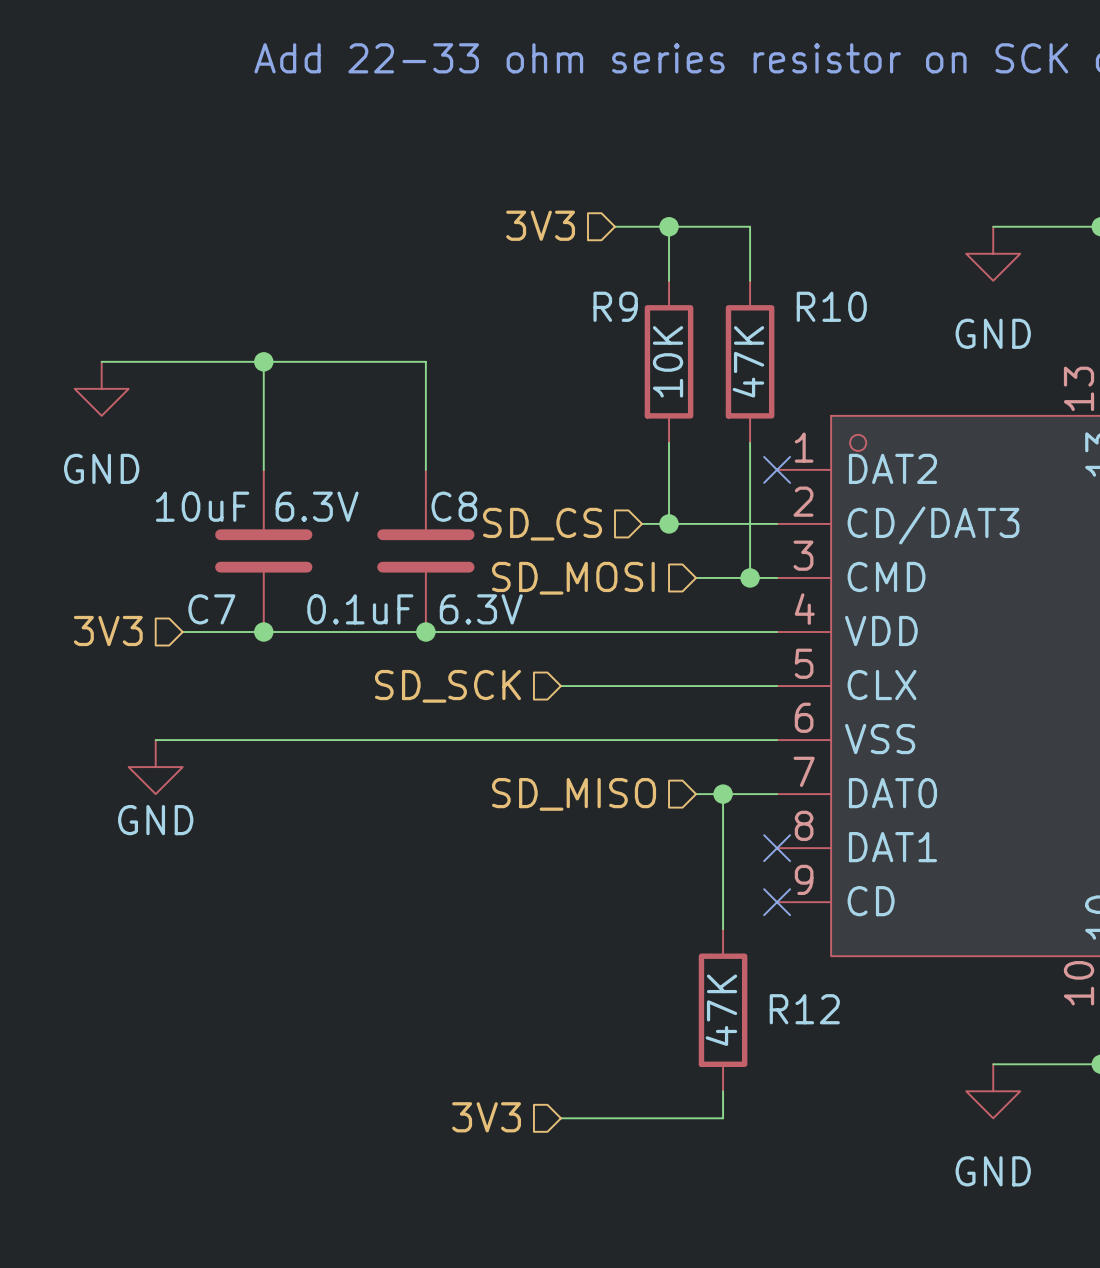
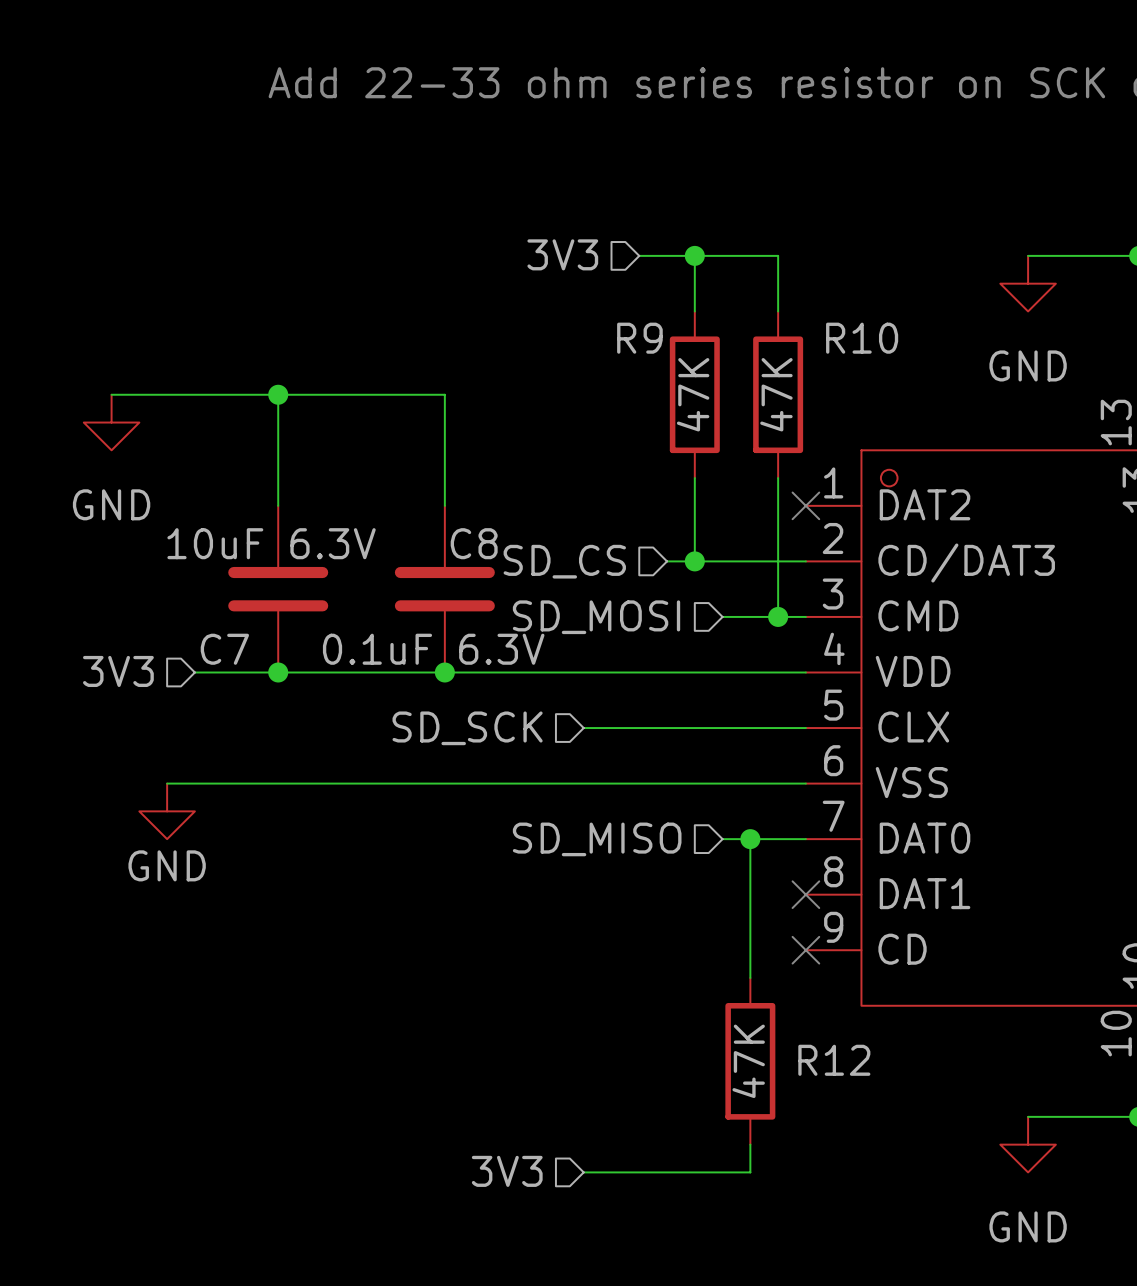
R9 value: 10K (668, 361) -> 47K (693, 394)

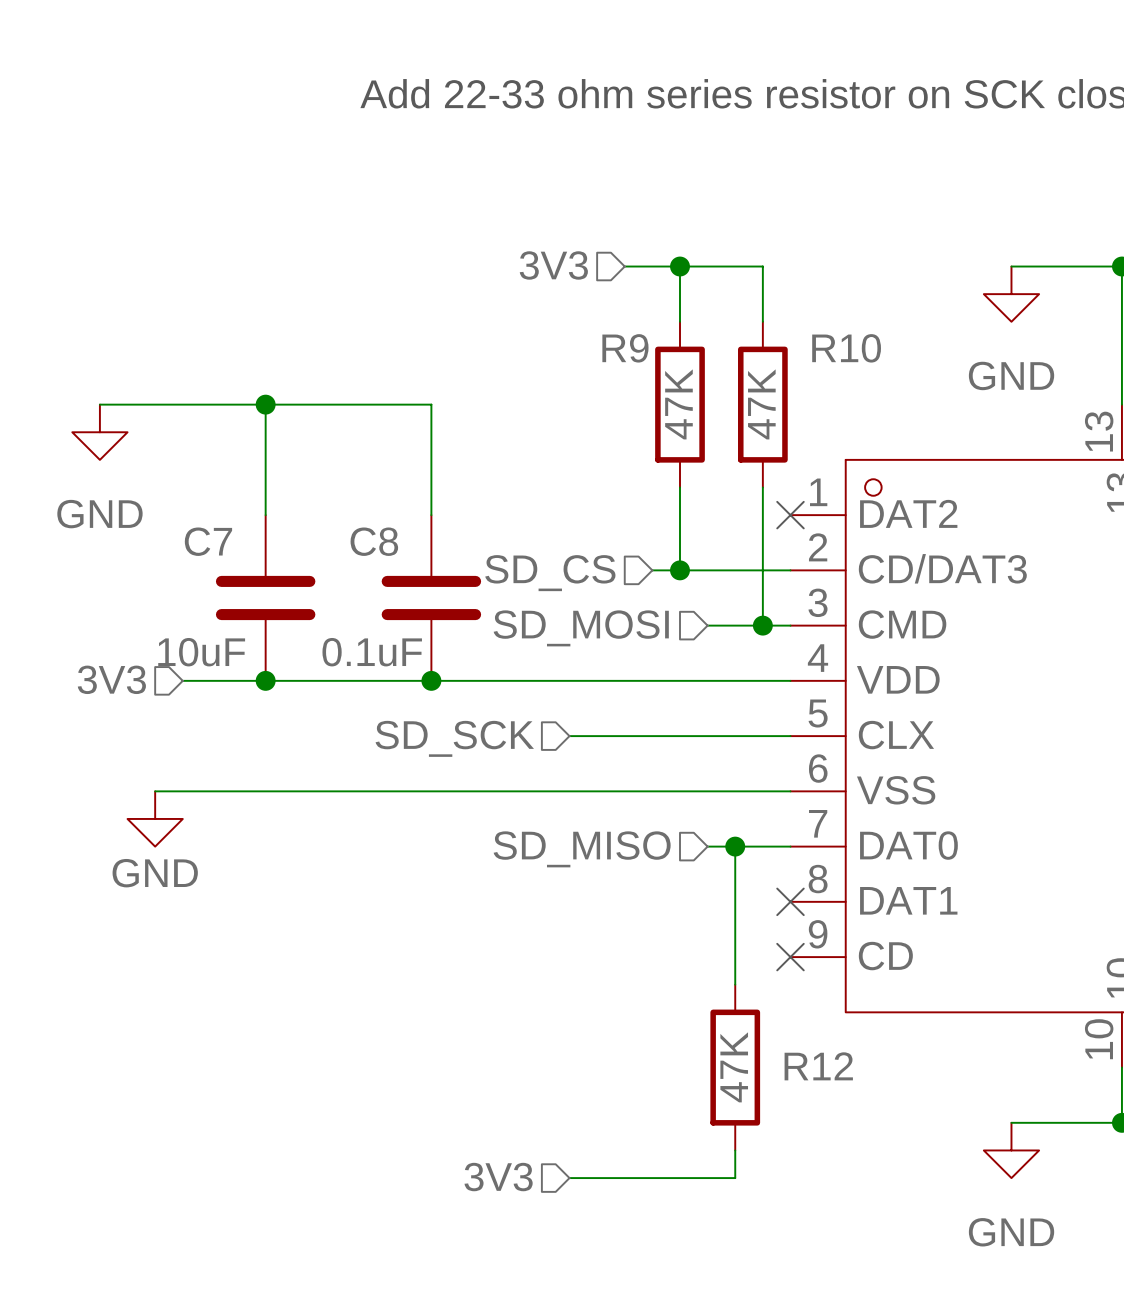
C7 value: 10uF 6.3V (271, 543) -> 10uF (201, 652)
C8 name position: C8 (474, 543) -> C8 (374, 541)
C7 name position: C7 (224, 649) -> C7 (208, 541)
C8 value: 0.1uF 6.3V (433, 649) -> 0.1uF (372, 652)

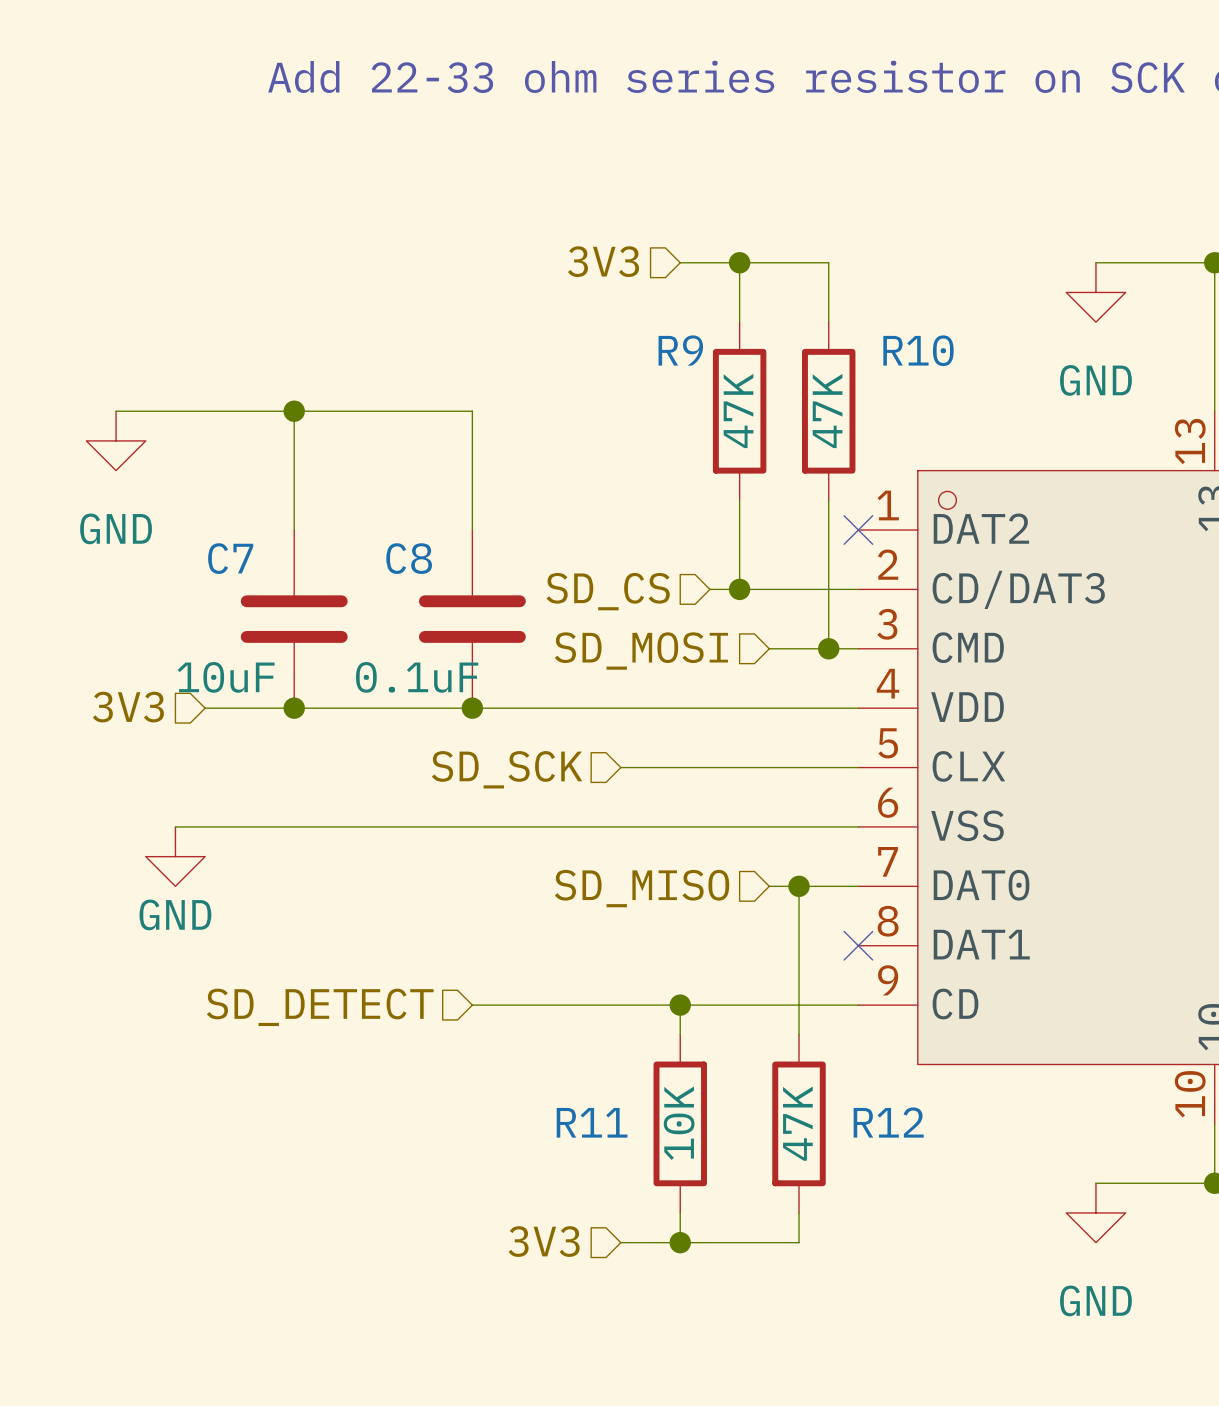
wire: none -> (472, 1005) (858, 1005)
wire: none -> (680, 1005) (680, 1034)
junction: none -> (680, 1005)
no-connect mark: (790, 957) -> none
hierarchical label: none -> SD_DETECT (320, 1007)
R11: none -> 10K (680, 1123)
wire: none -> (680, 1212) (680, 1242)
junction: none -> (680, 1242)

